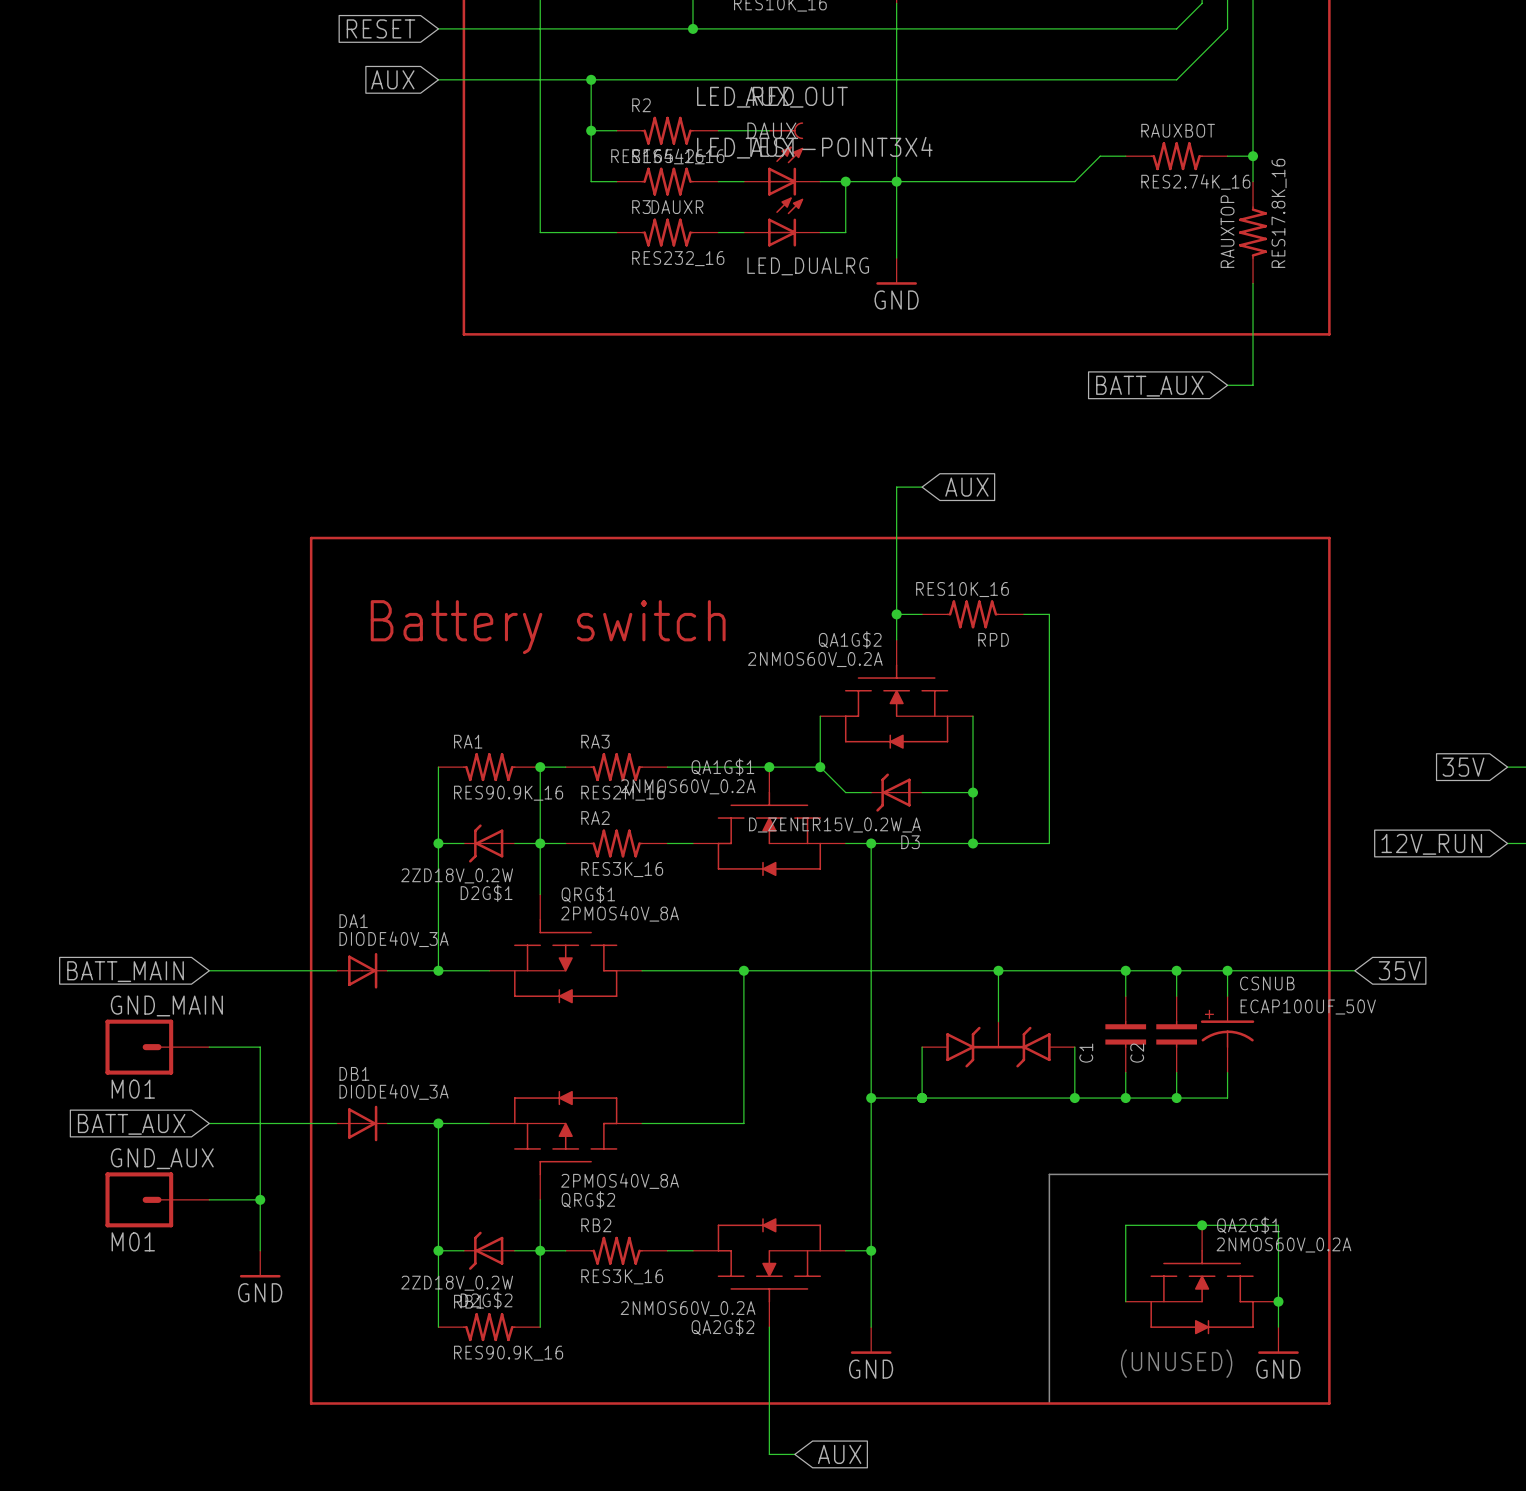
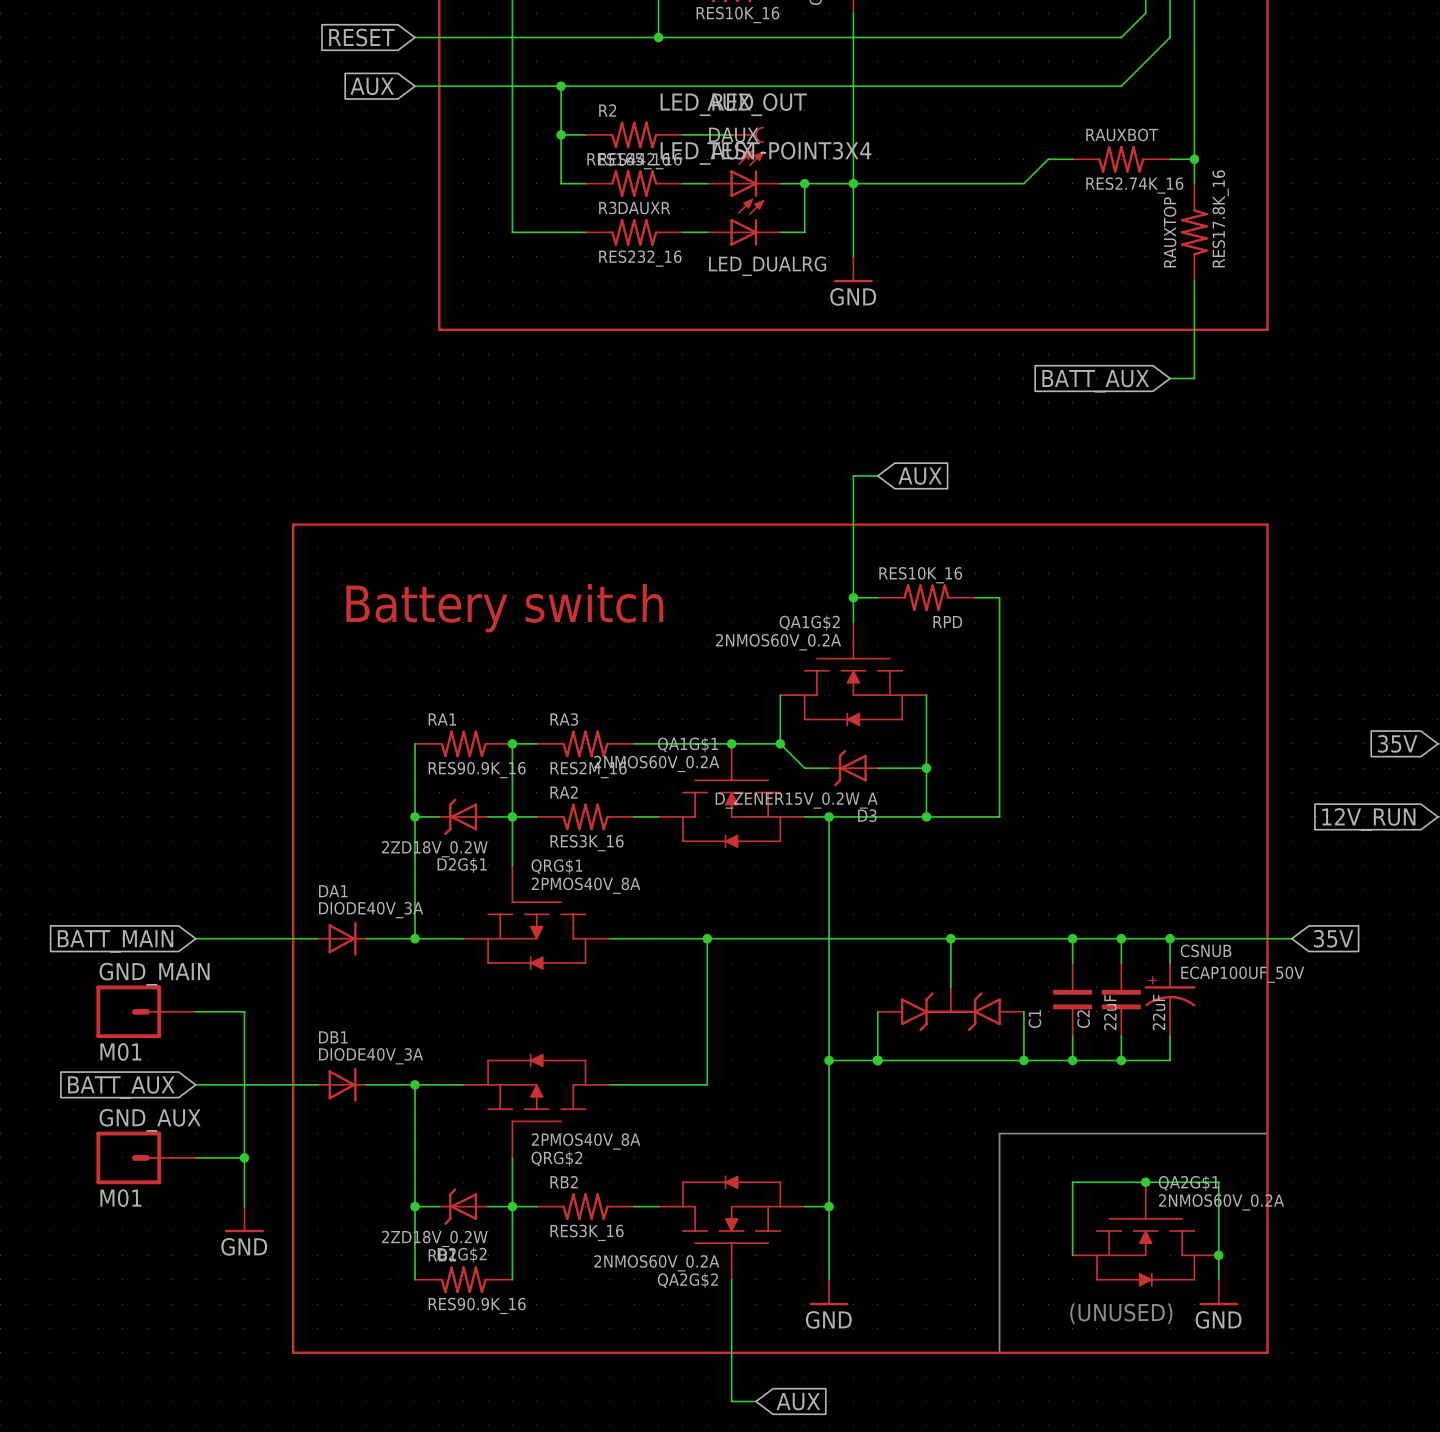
C1 value: none -> 22uF (1110, 1012)
C2 value: none -> 22uF (1159, 1012)

